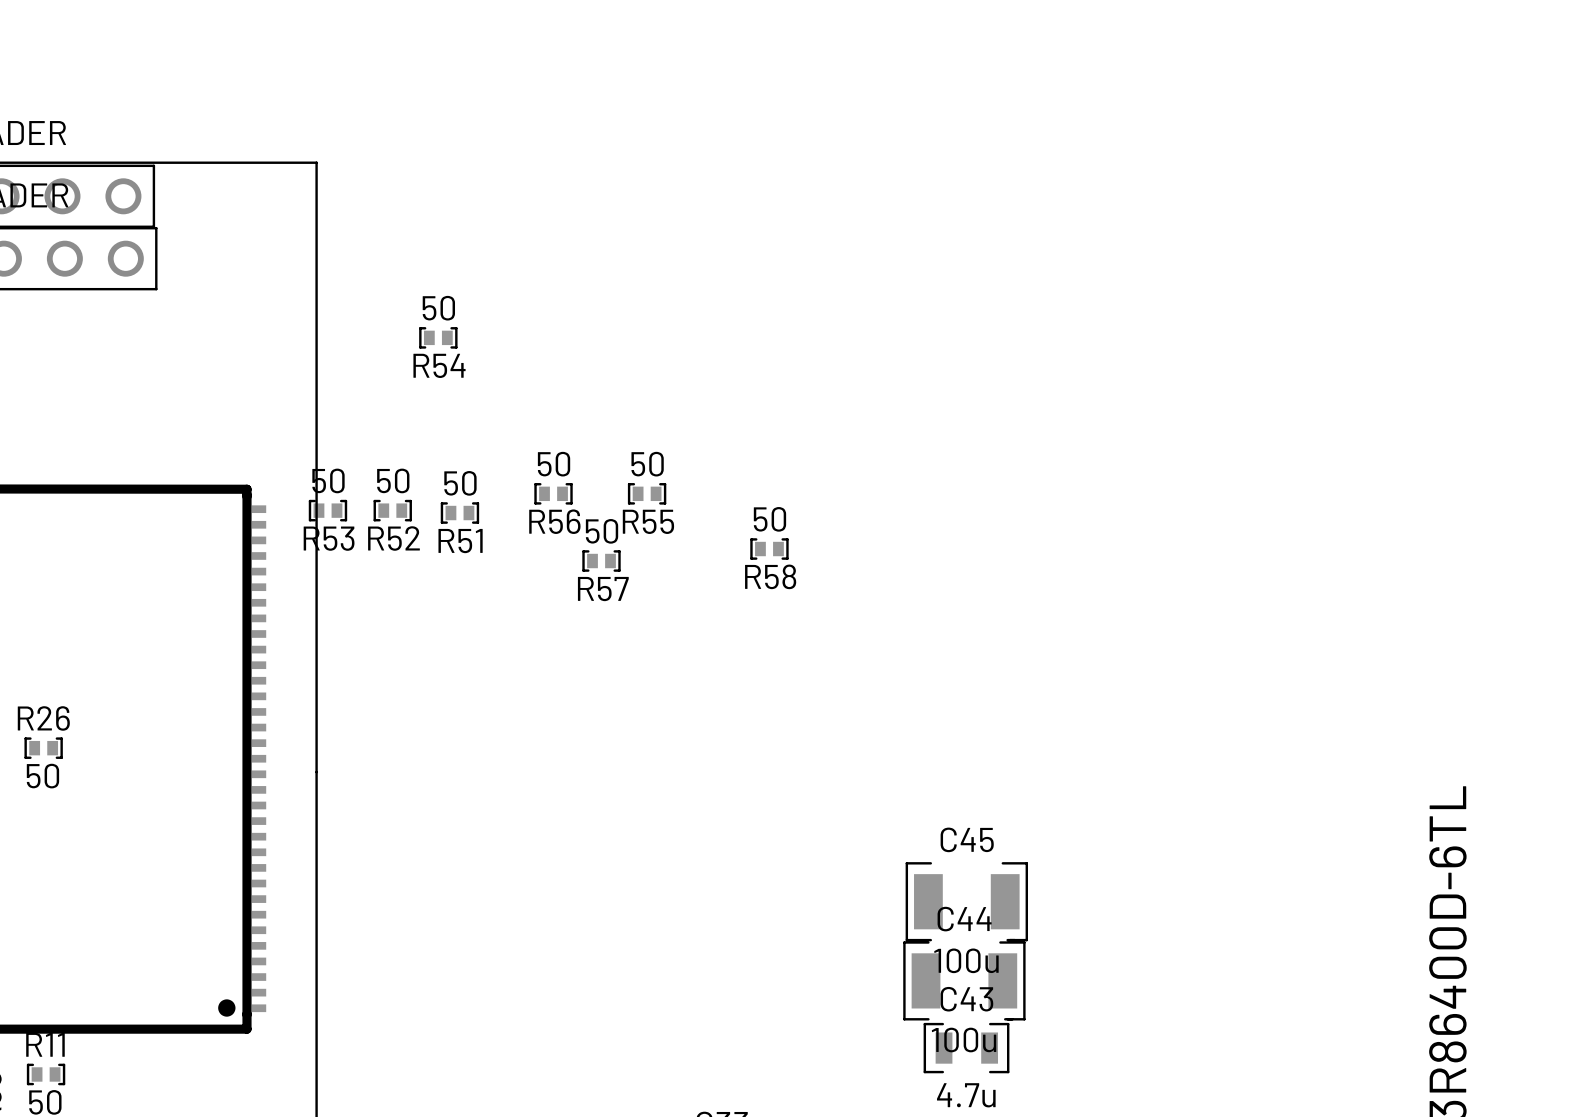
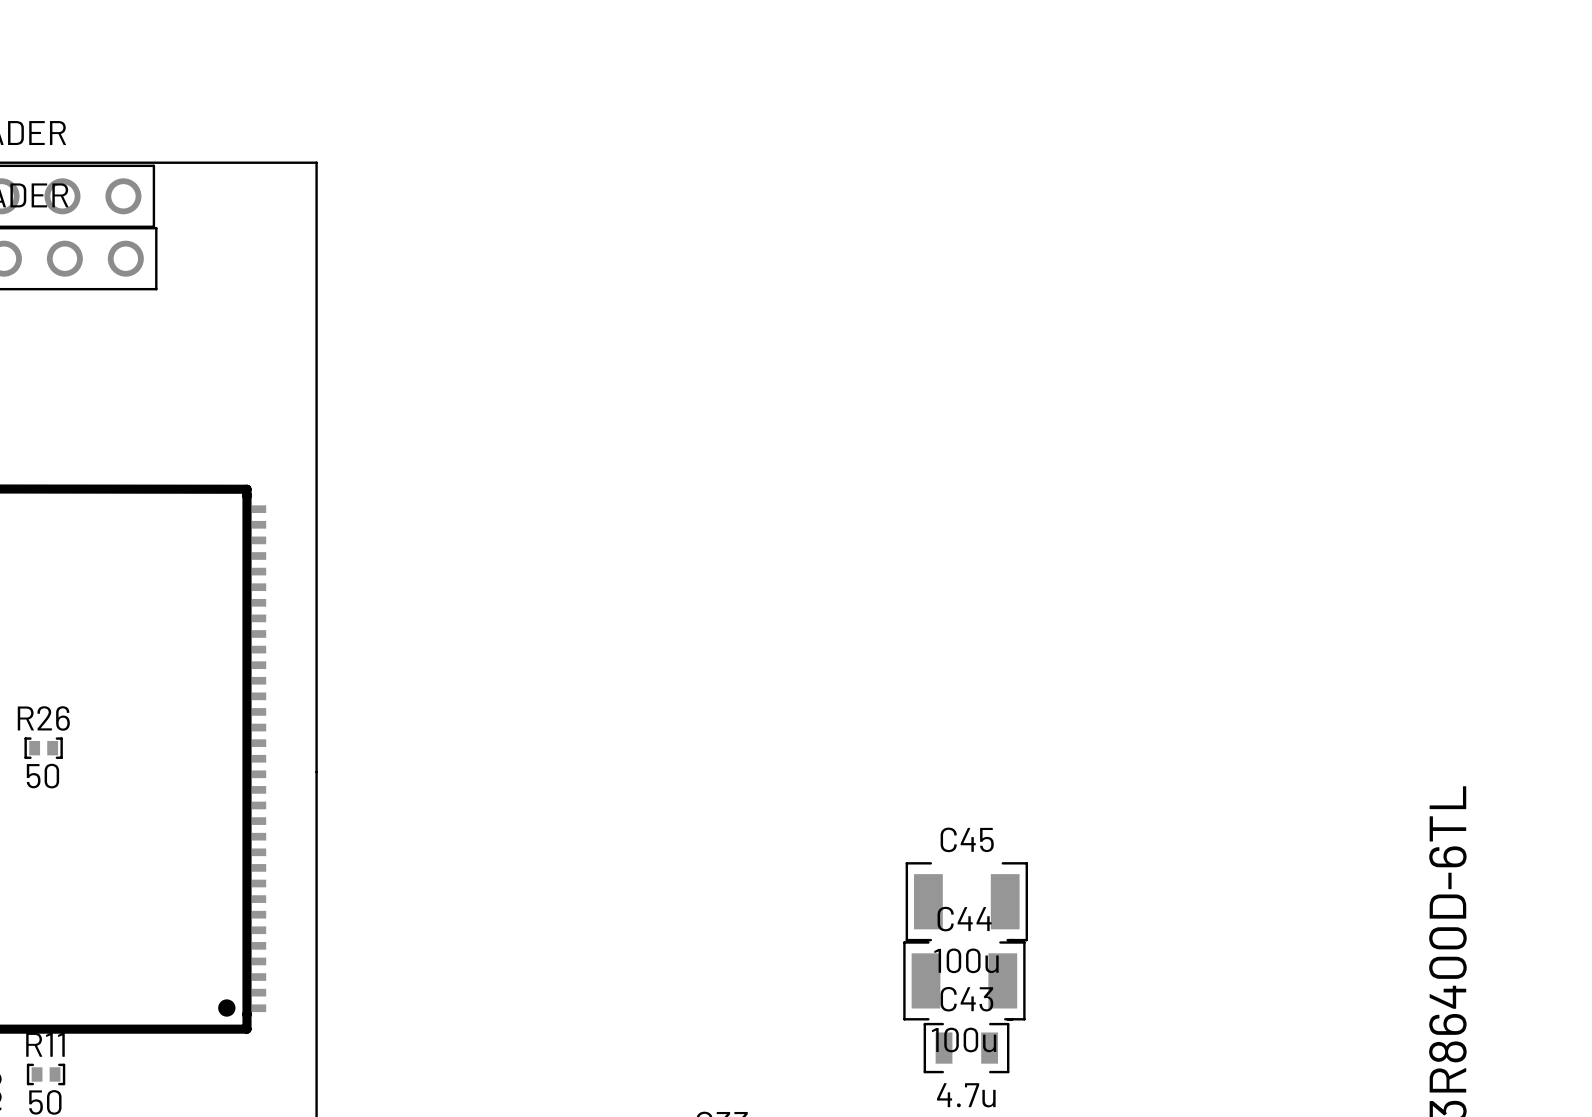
R54: 50 (438, 337) -> none
R56: 50 (553, 493) -> none
R55: 50 (647, 493) -> none
R53: 50 (327, 510) -> none
R52: 50 (392, 510) -> none
R51: 50 (459, 513) -> none
R58: 50 (769, 549) -> none
R57: 50 (601, 561) -> none

